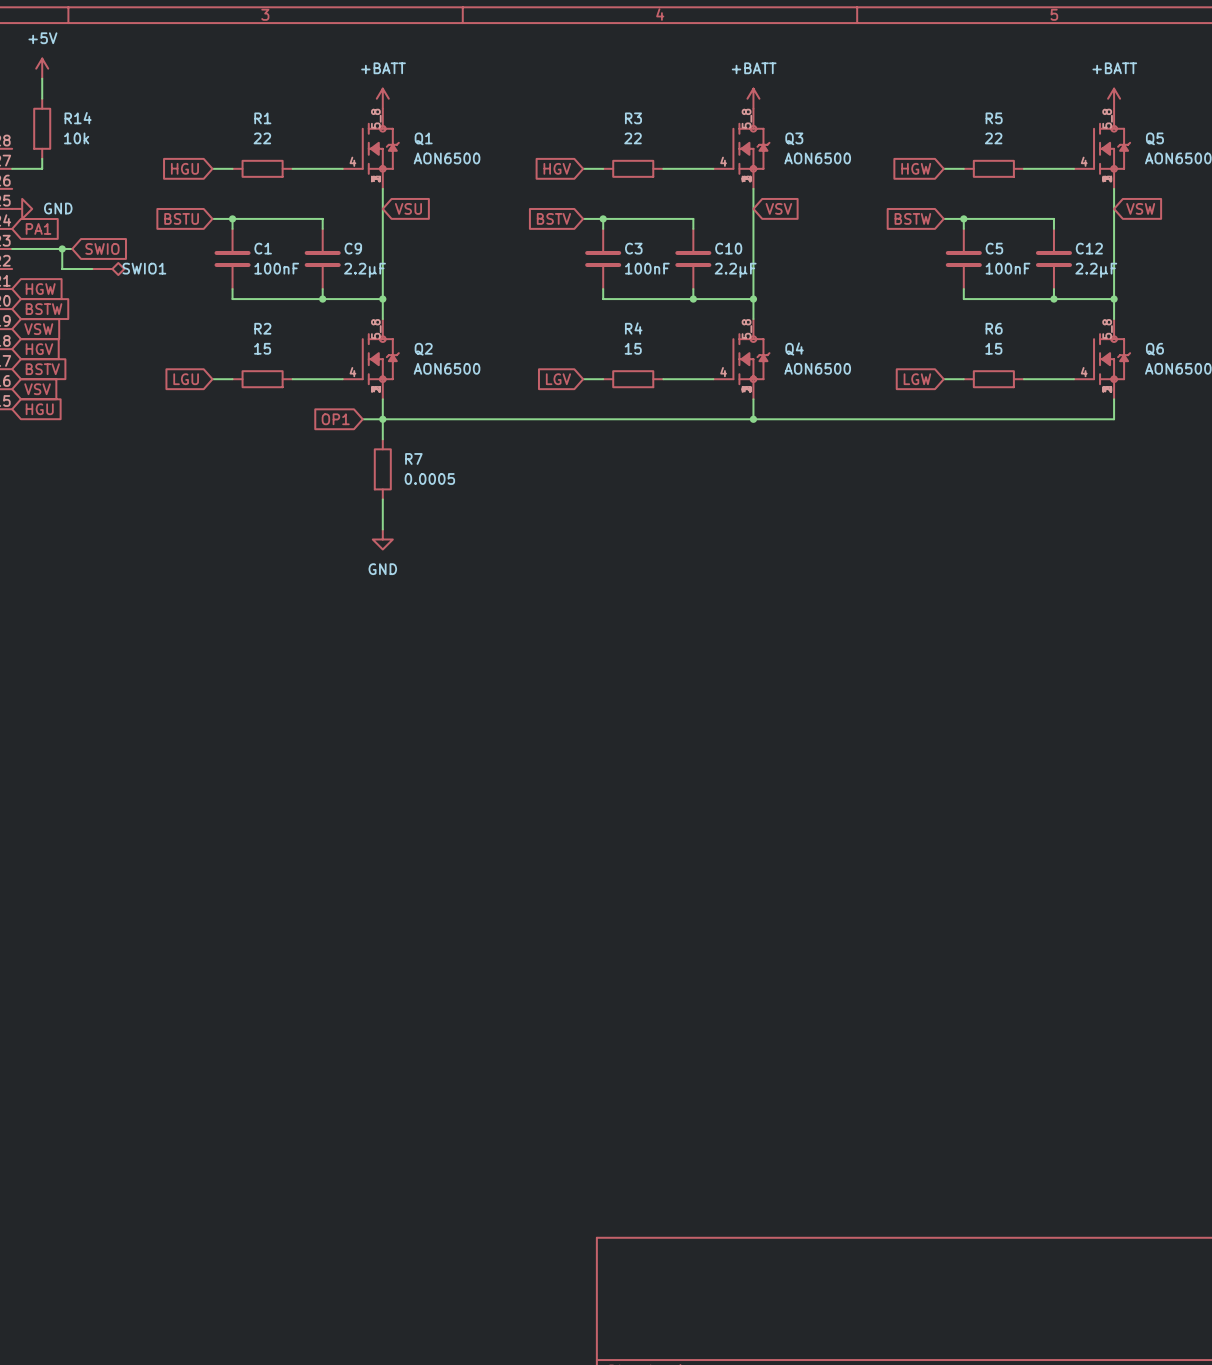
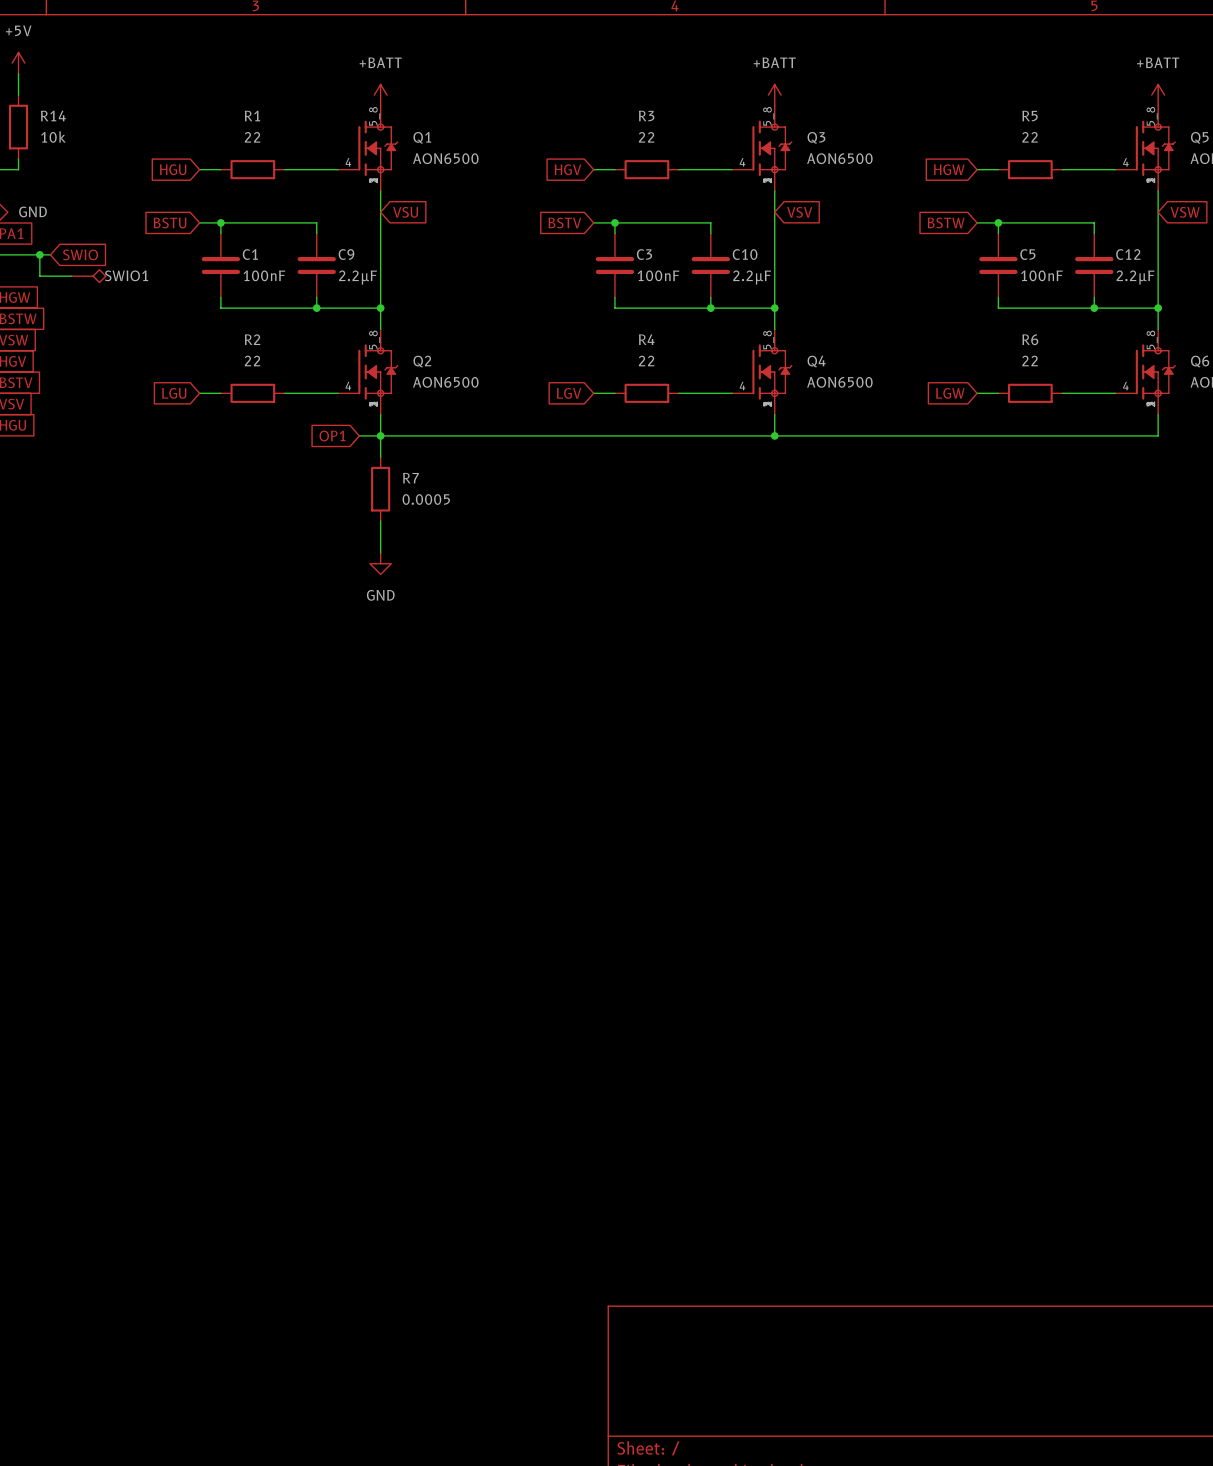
R2 value: 15 (262, 348) -> 22 (252, 360)
R4 value: 15 (633, 348) -> 22 (646, 360)
R6 value: 15 (993, 348) -> 22 (1030, 360)

